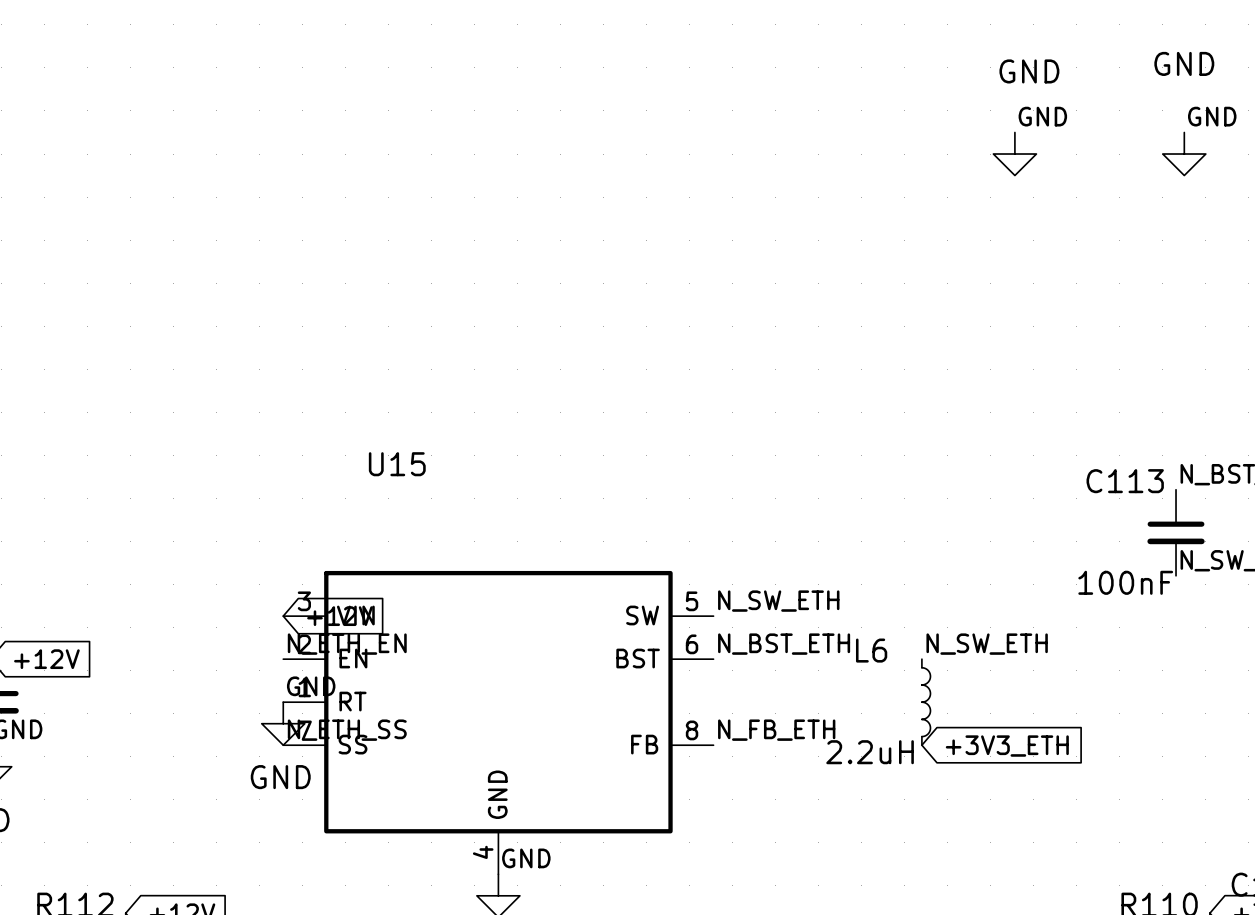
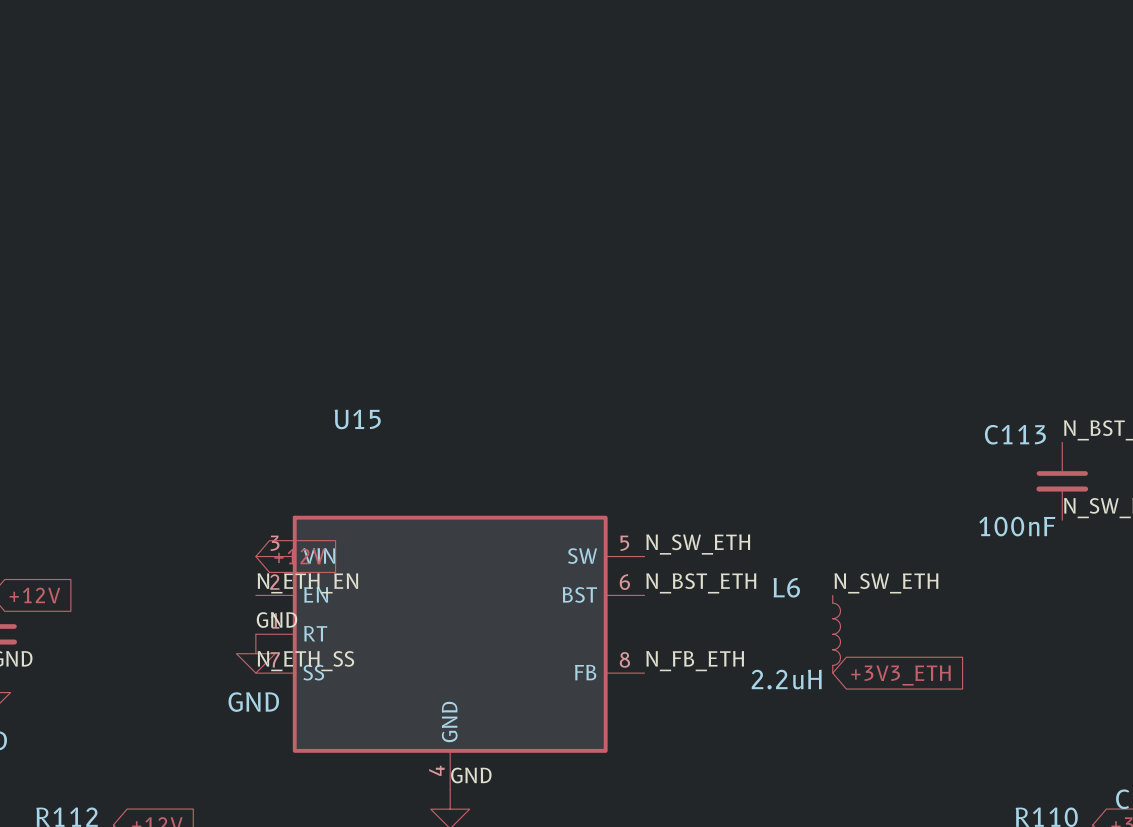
label: GND (1042, 116) -> none
label: GND (1212, 116) -> none
power symbol: GND (1014, 154) -> none
power symbol: GND (1184, 154) -> none

